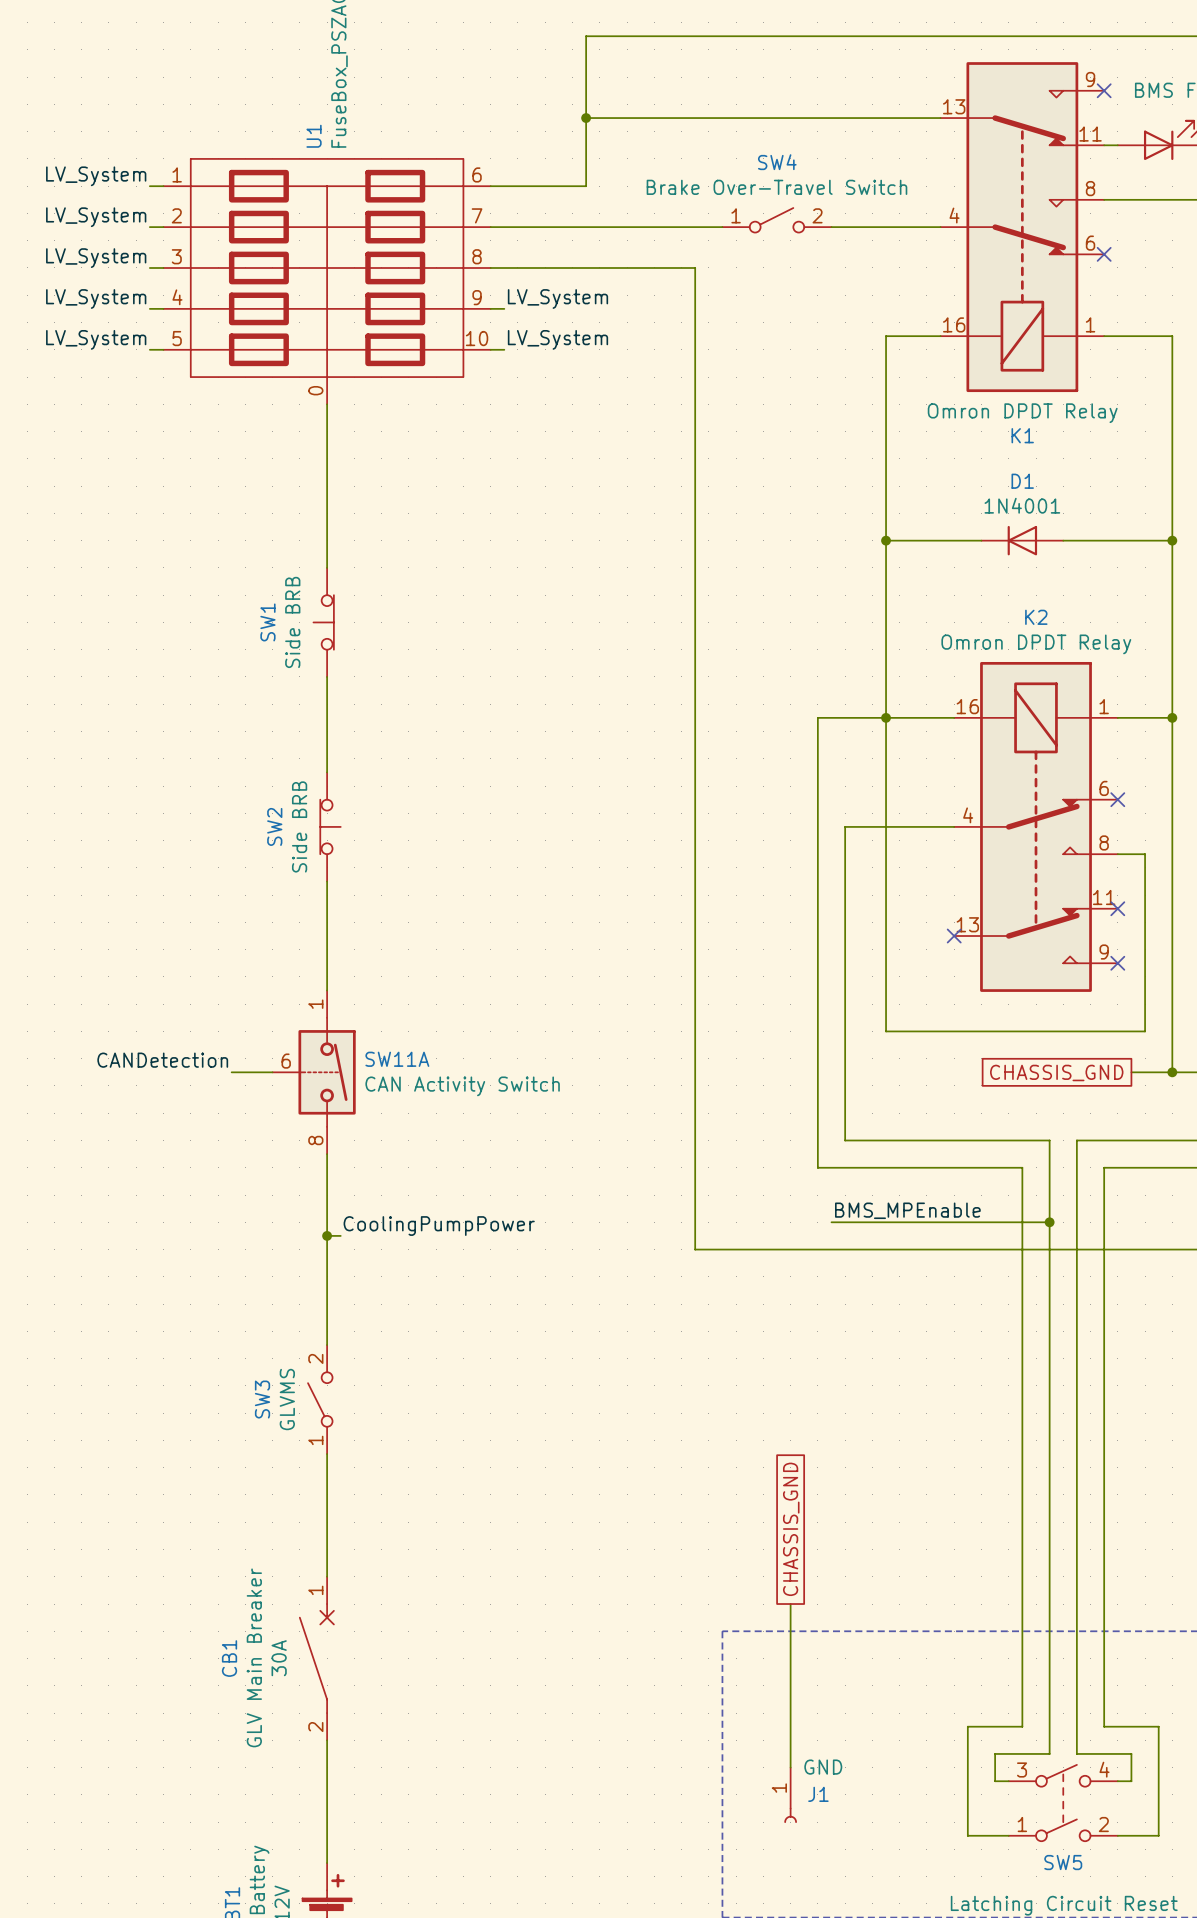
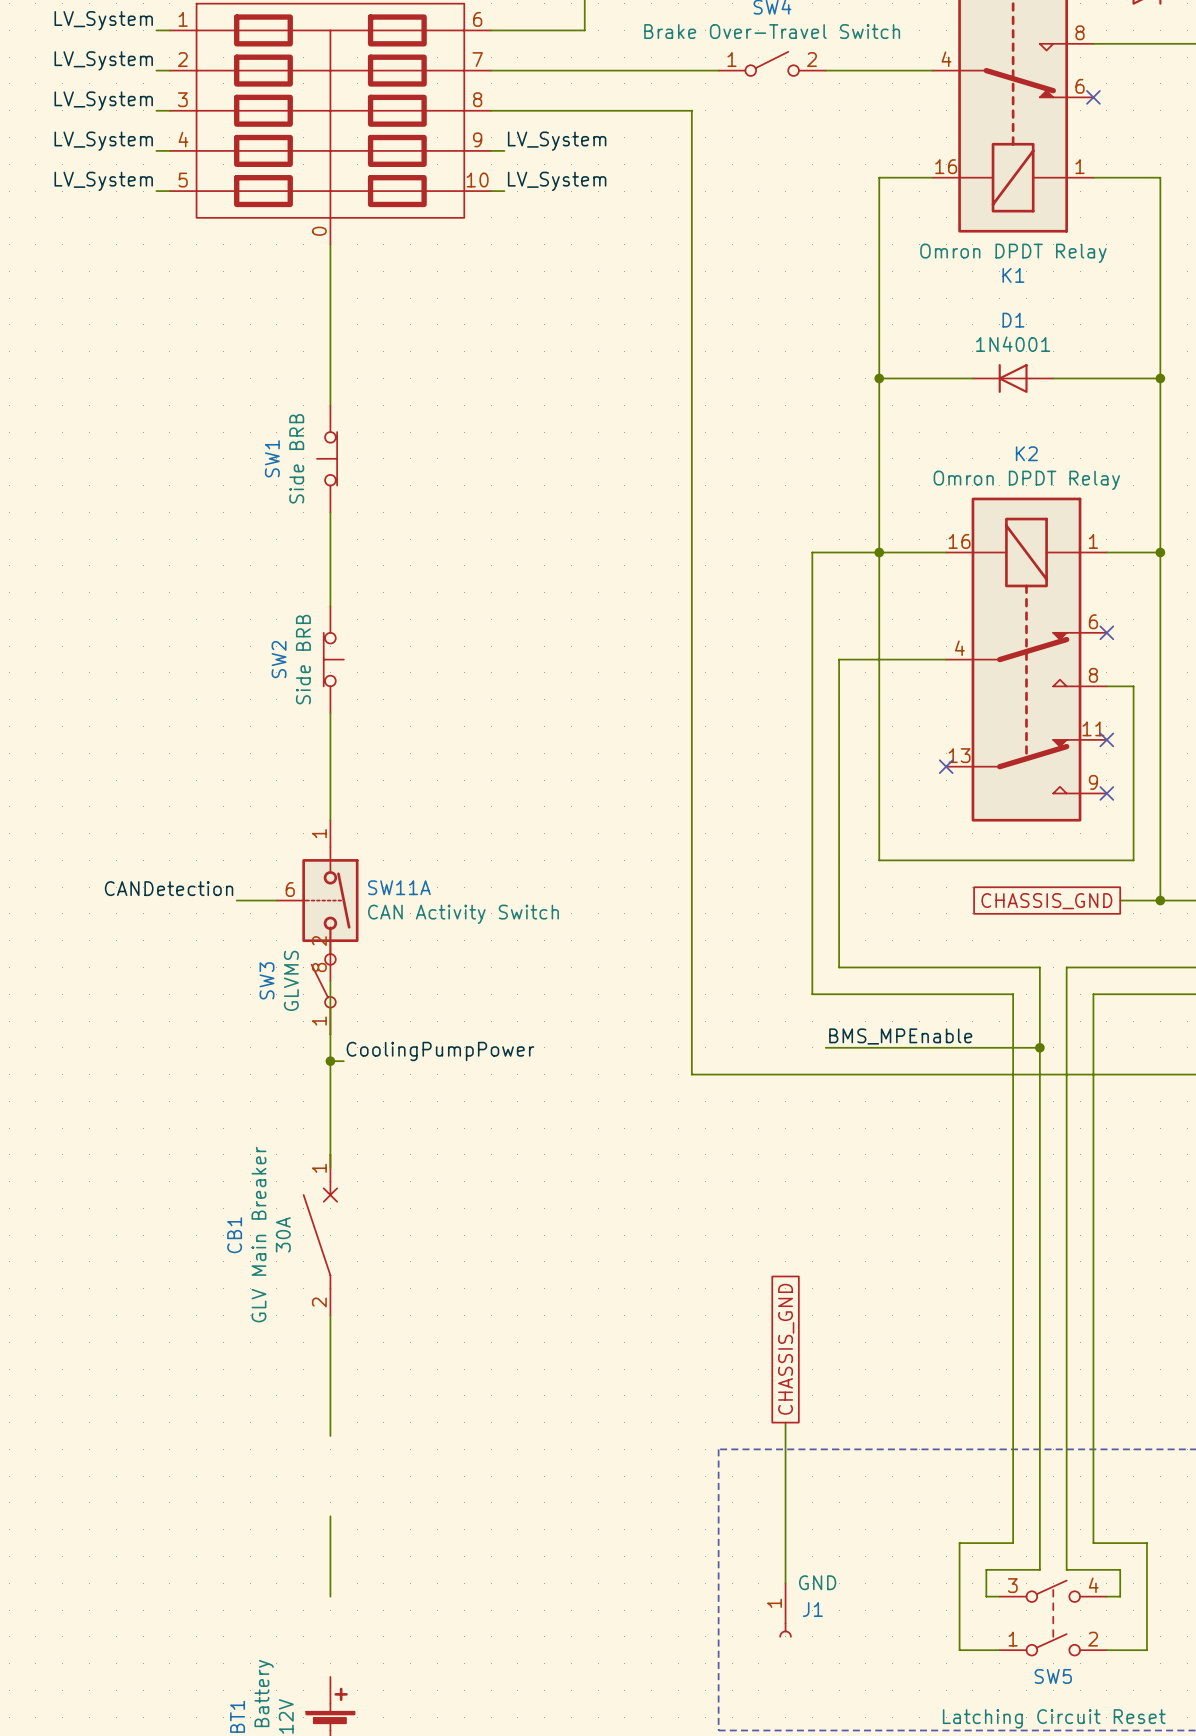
SW3 position: (320, 1399) -> (323, 980)
CB1 position: (316, 1658) -> (320, 1235)
wire: (327, 1781) (327, 1863) -> none

